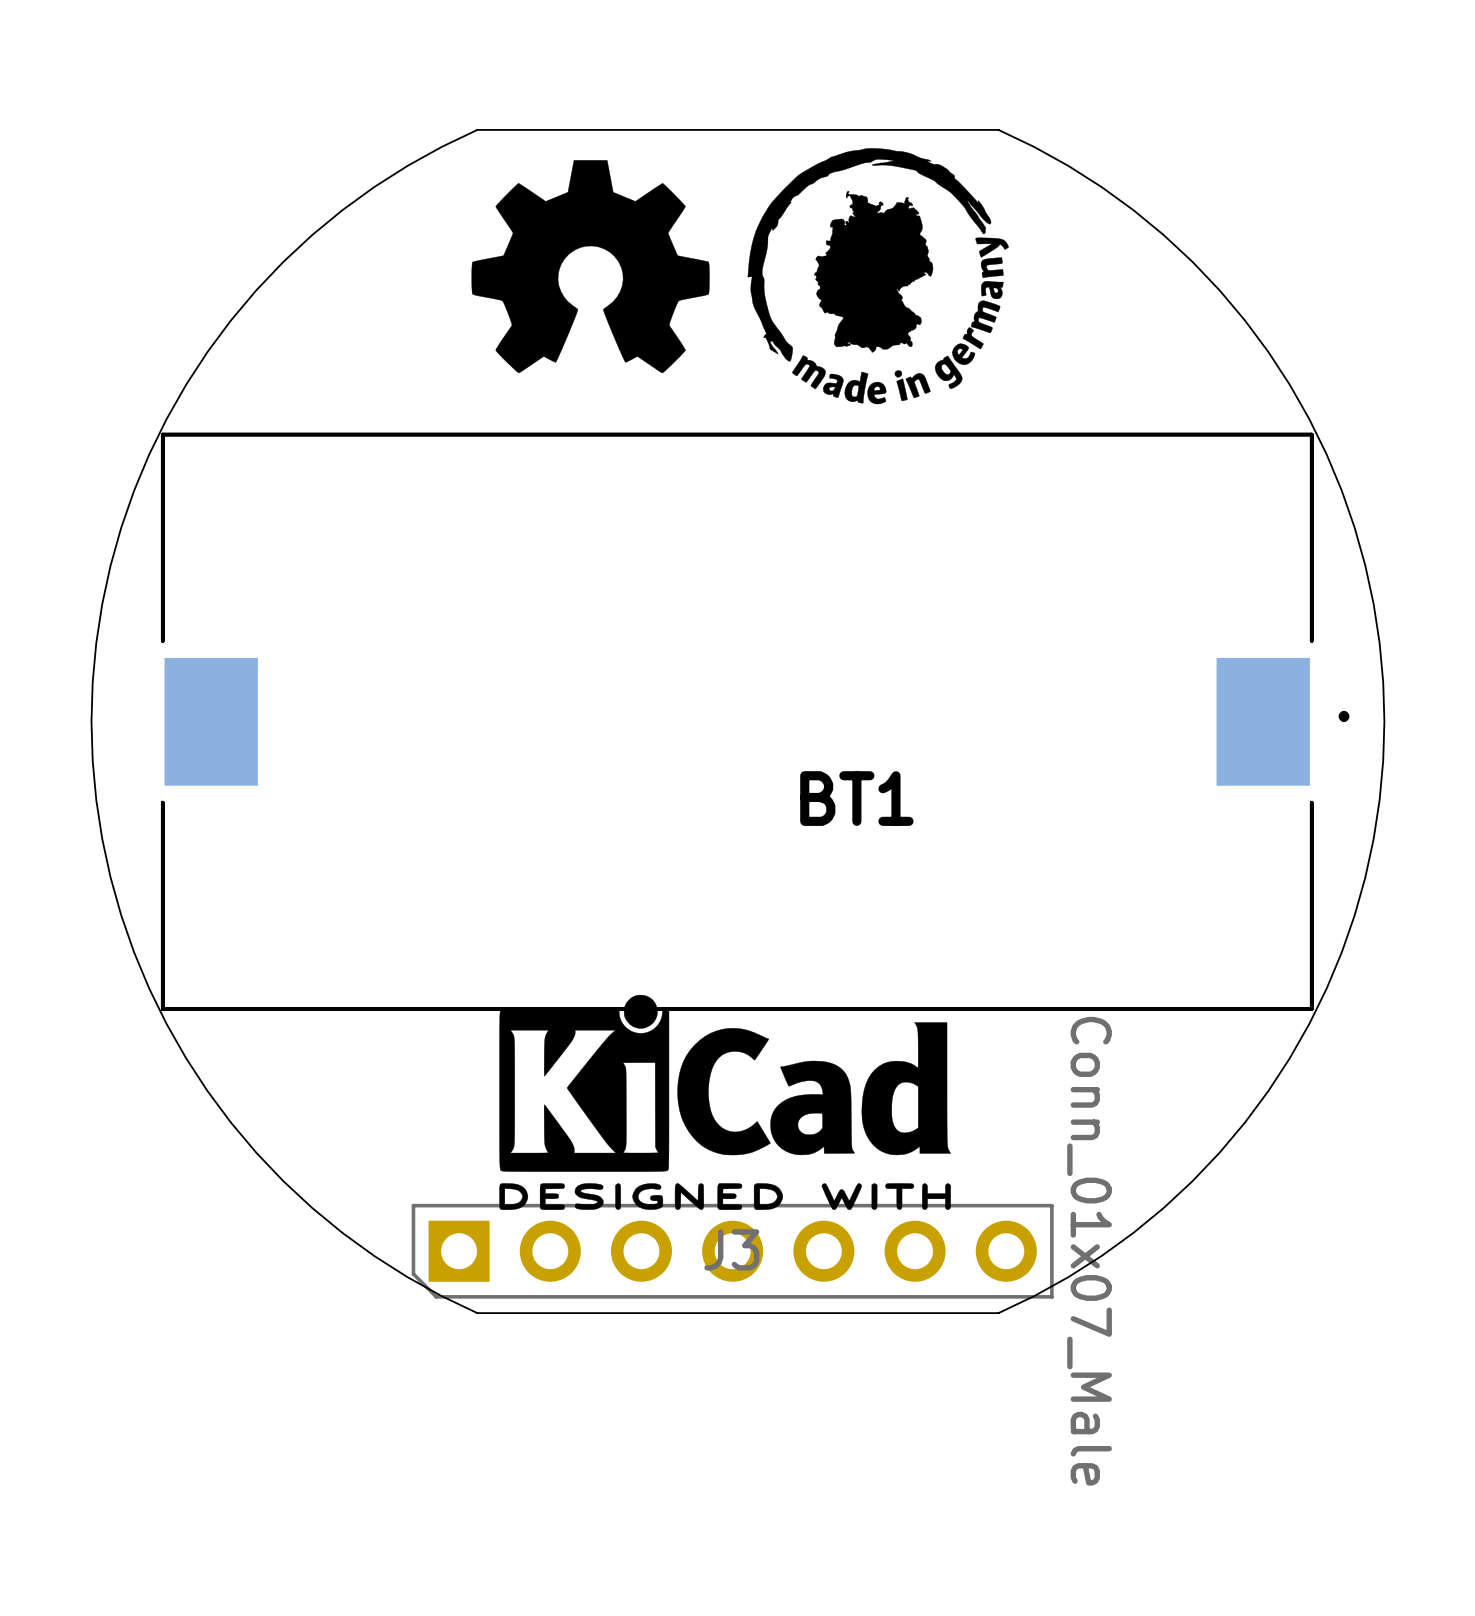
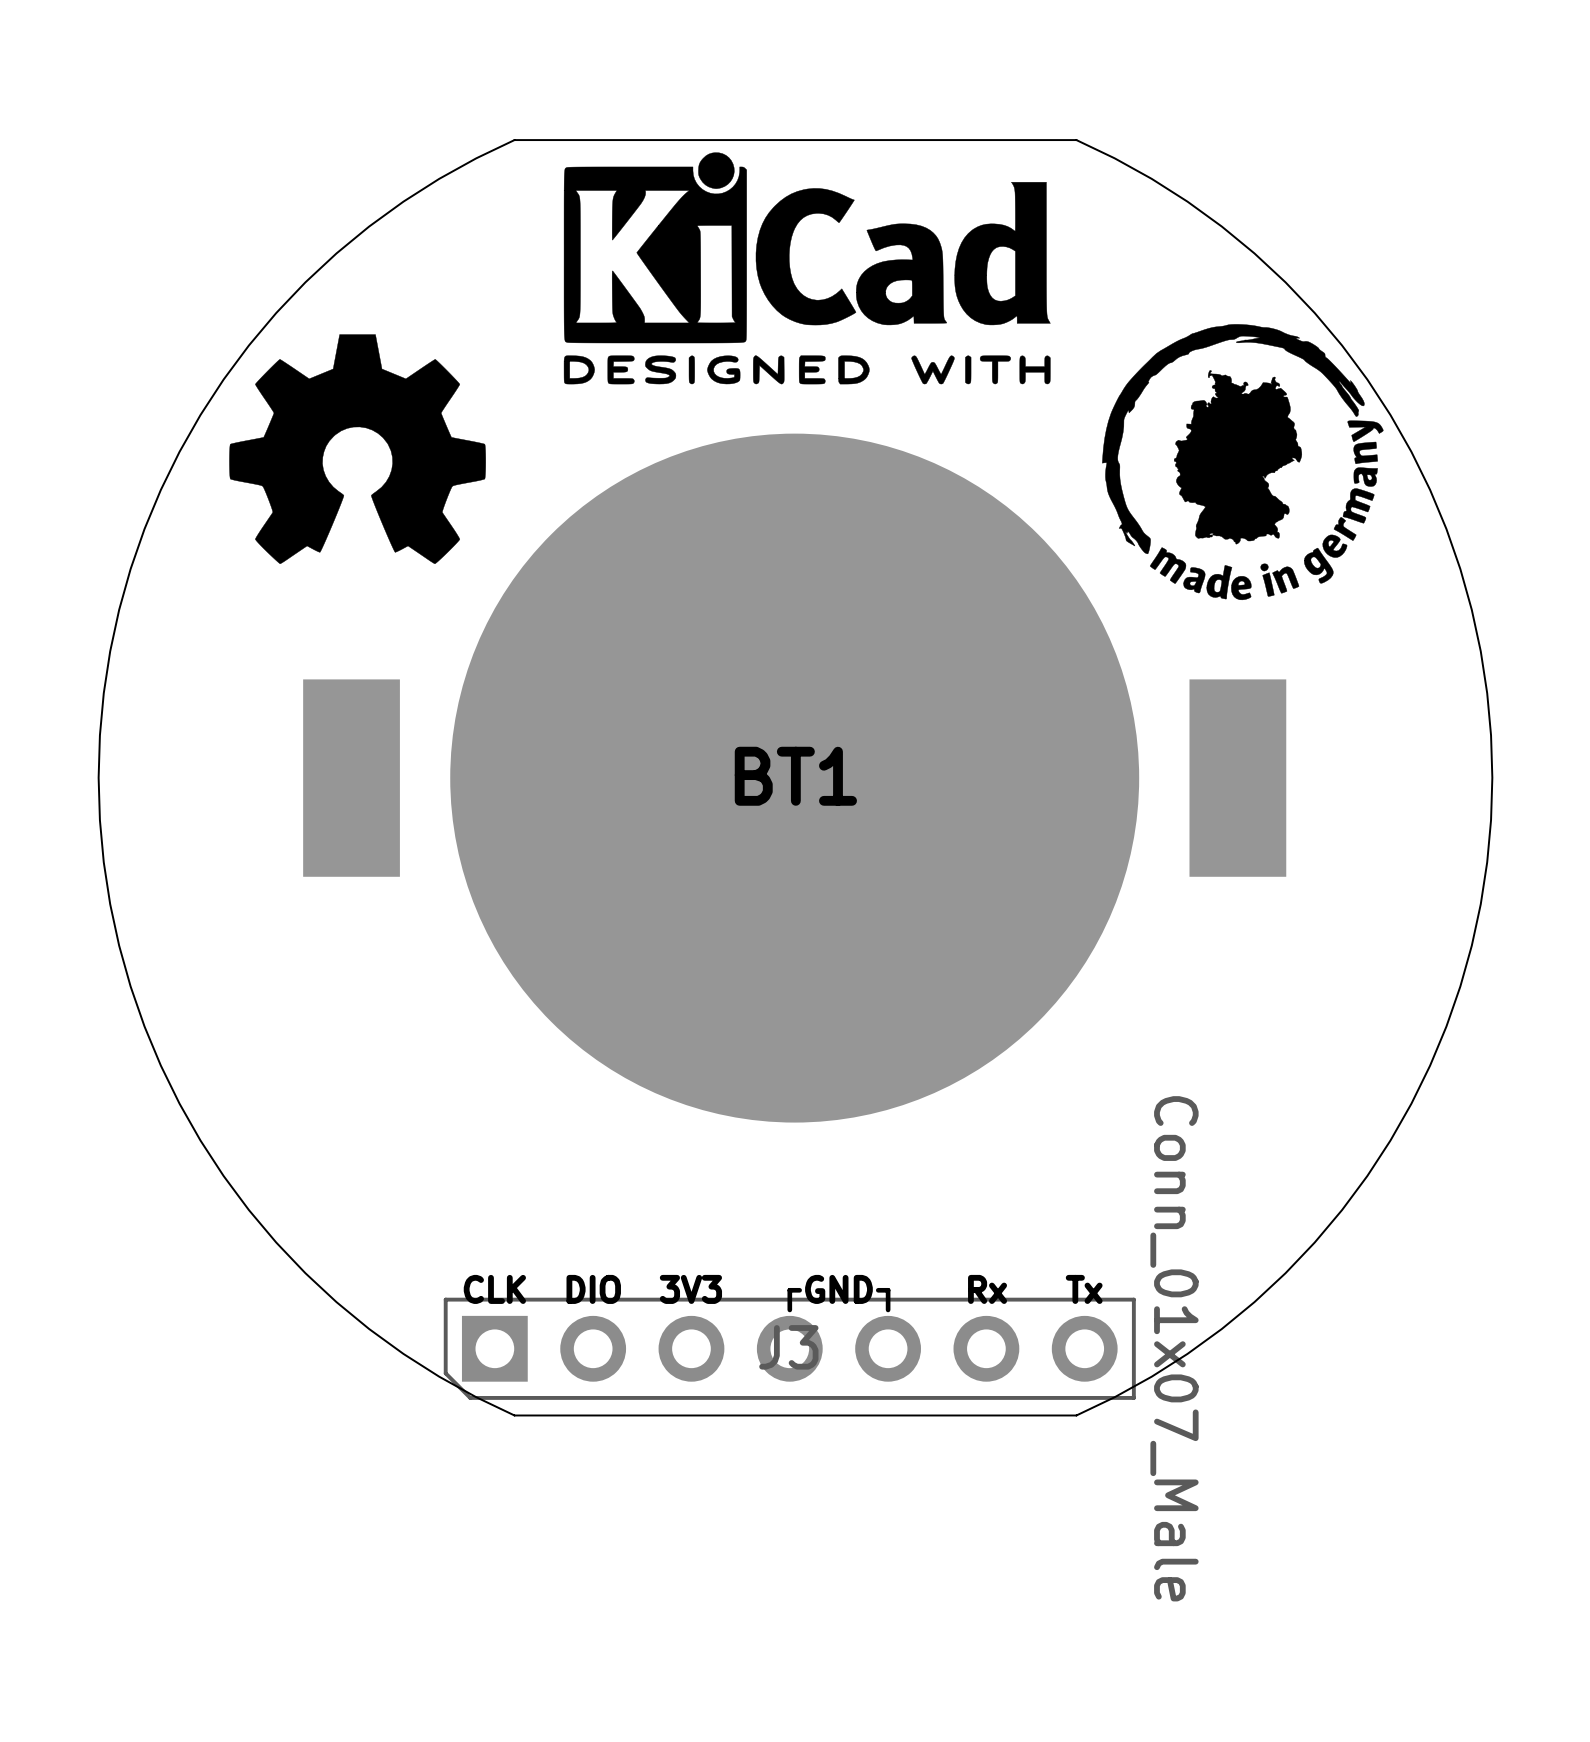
drawing position: (590, 266) -> (357, 449)
drawing position: (878, 276) -> (1242, 462)
BT1 footprint: [160, 432, 1350, 1011] -> [303, 433, 1287, 1123]
BT1 name position: BT1 (856, 798) -> BT1 (795, 776)
drawing position: (725, 1102) -> (807, 268)
text: none -> CLK (494, 1289)
text: none -> DIO (593, 1289)
text: none -> 3V3 (690, 1289)
line: none -> (799, 1290) (789, 1290) (789, 1309)
text: none -> GND (838, 1289)
line: none -> (878, 1290) (888, 1290) (888, 1309)
text: none -> Rx (987, 1289)
text: none -> Tx (1084, 1289)

